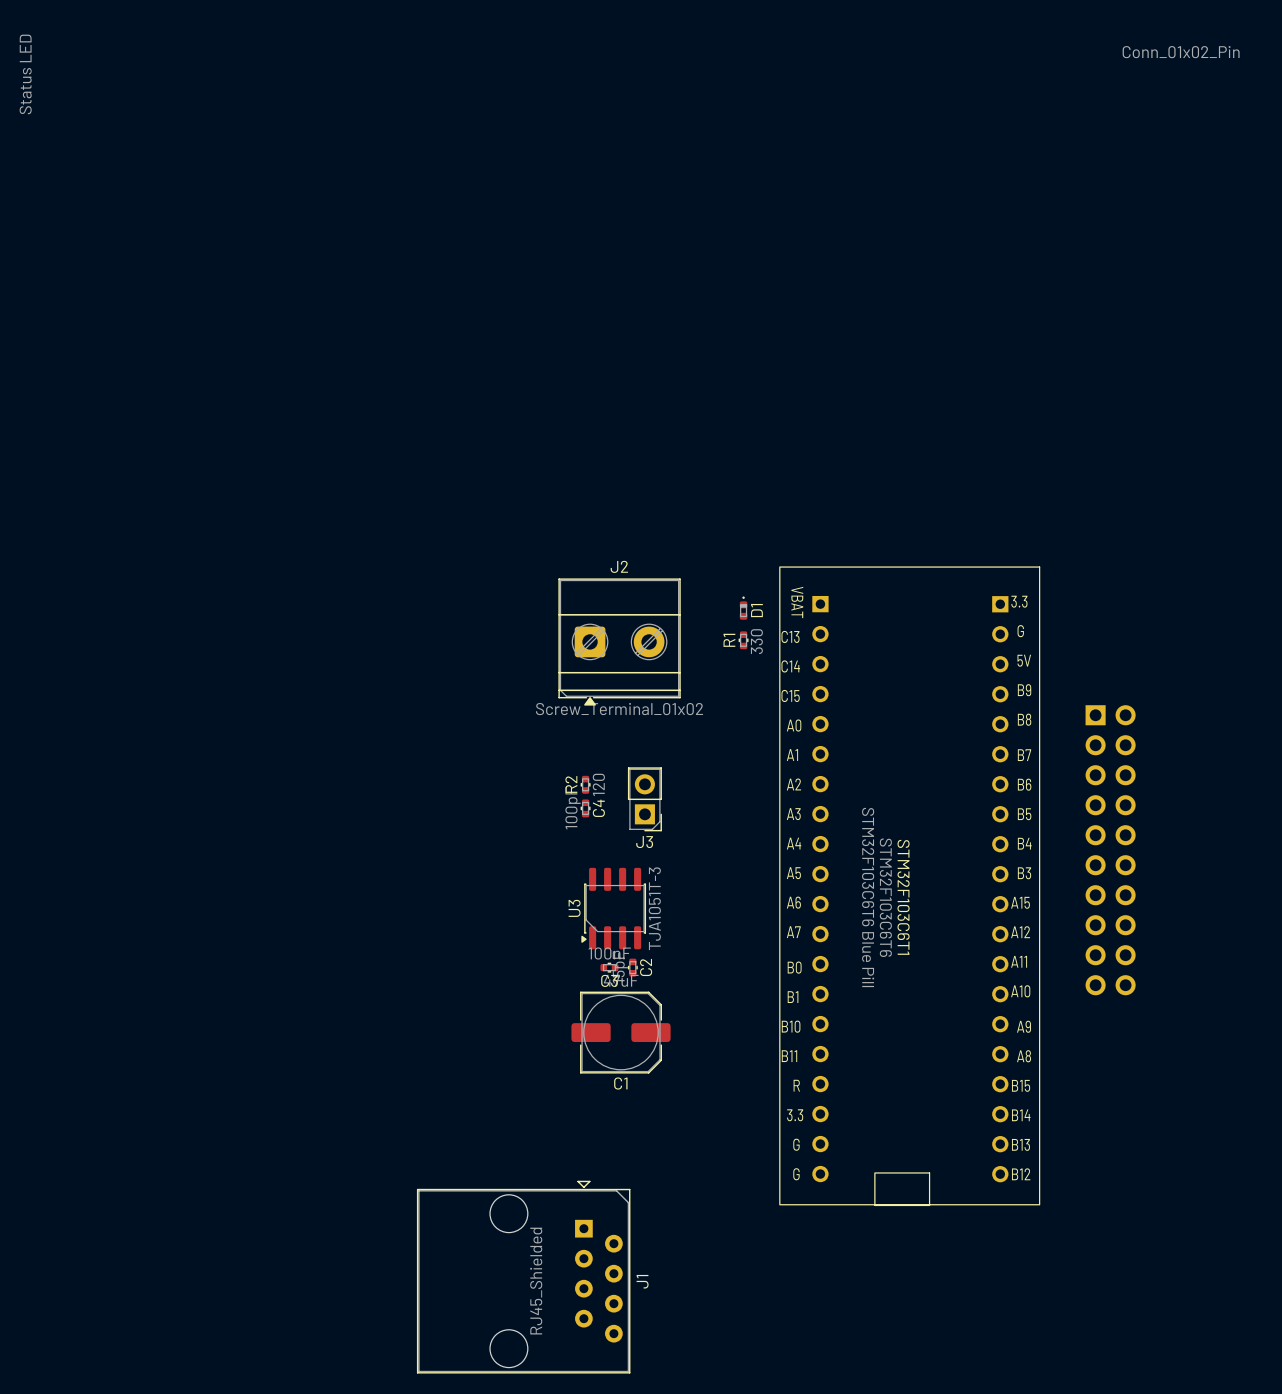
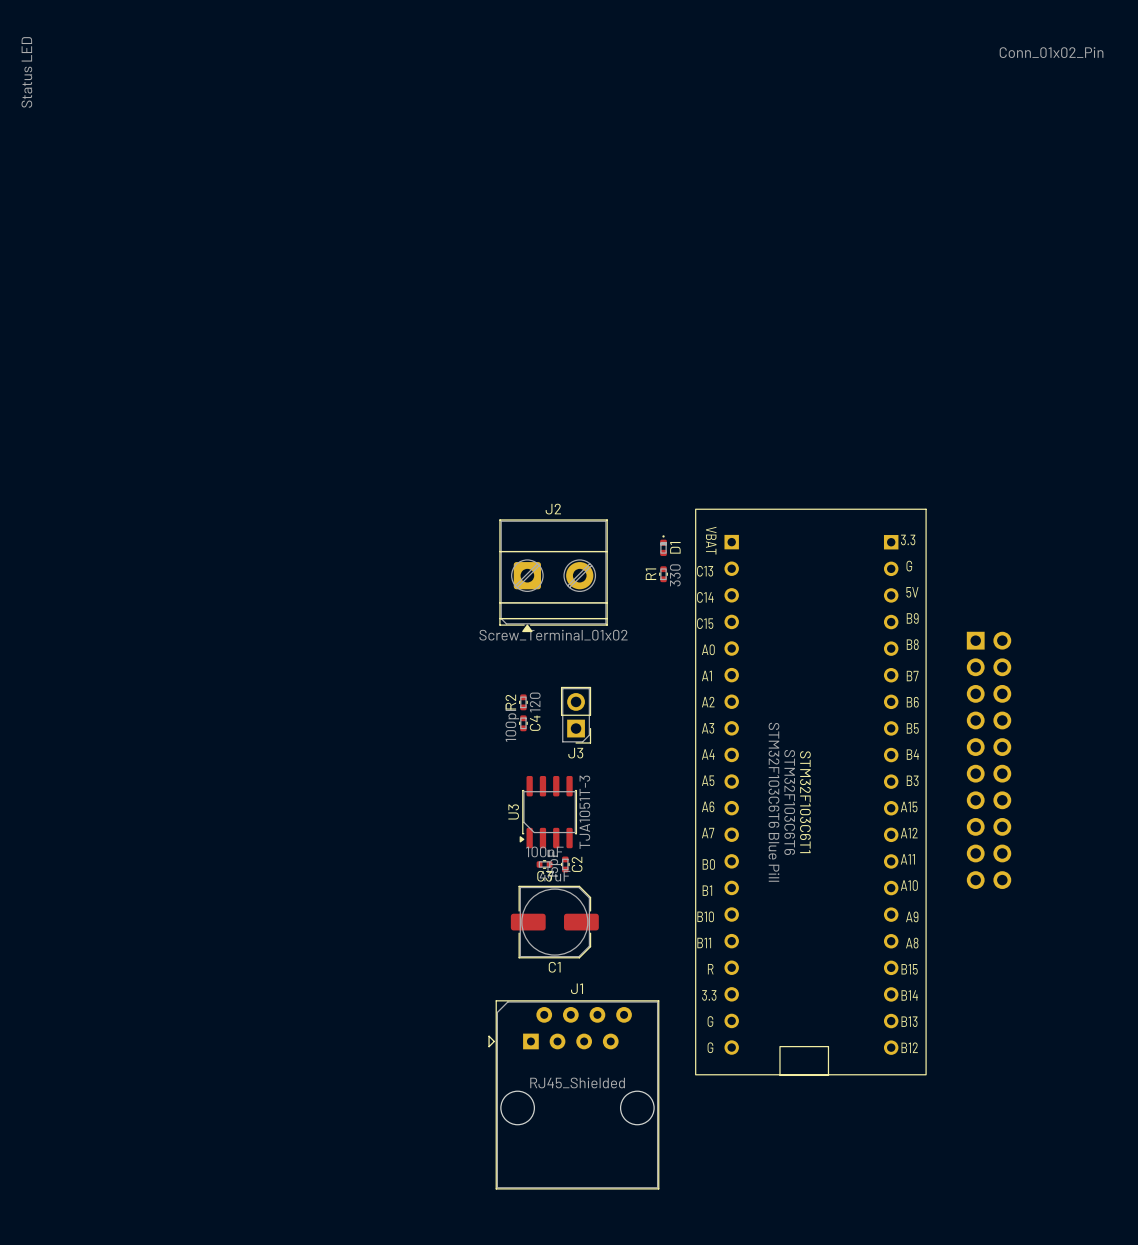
J1 rotation: 0° (523, 1277) -> 90° counterclockwise (573, 1094)
J1 position: (523, 1277) -> (573, 1094)

